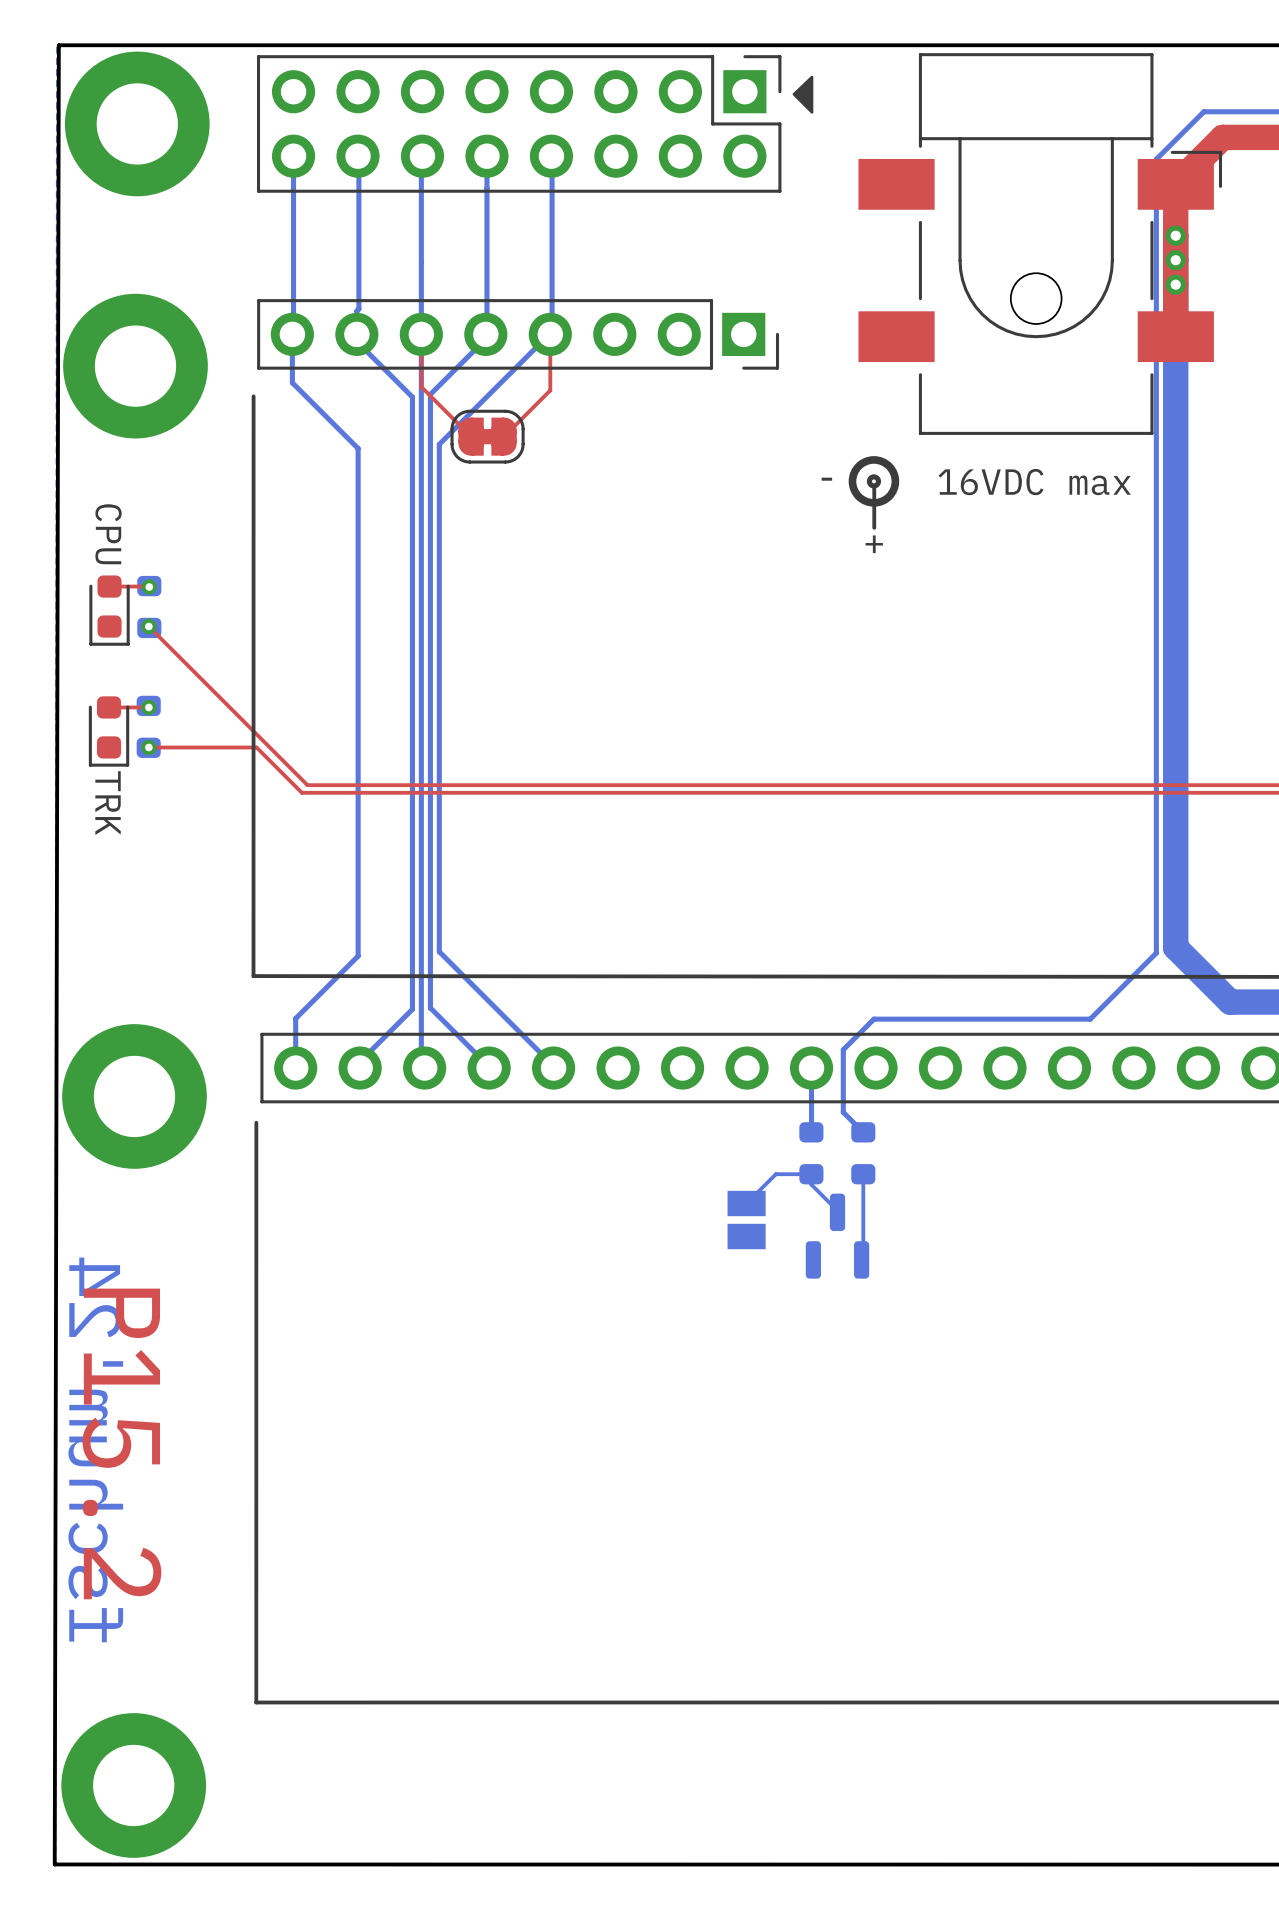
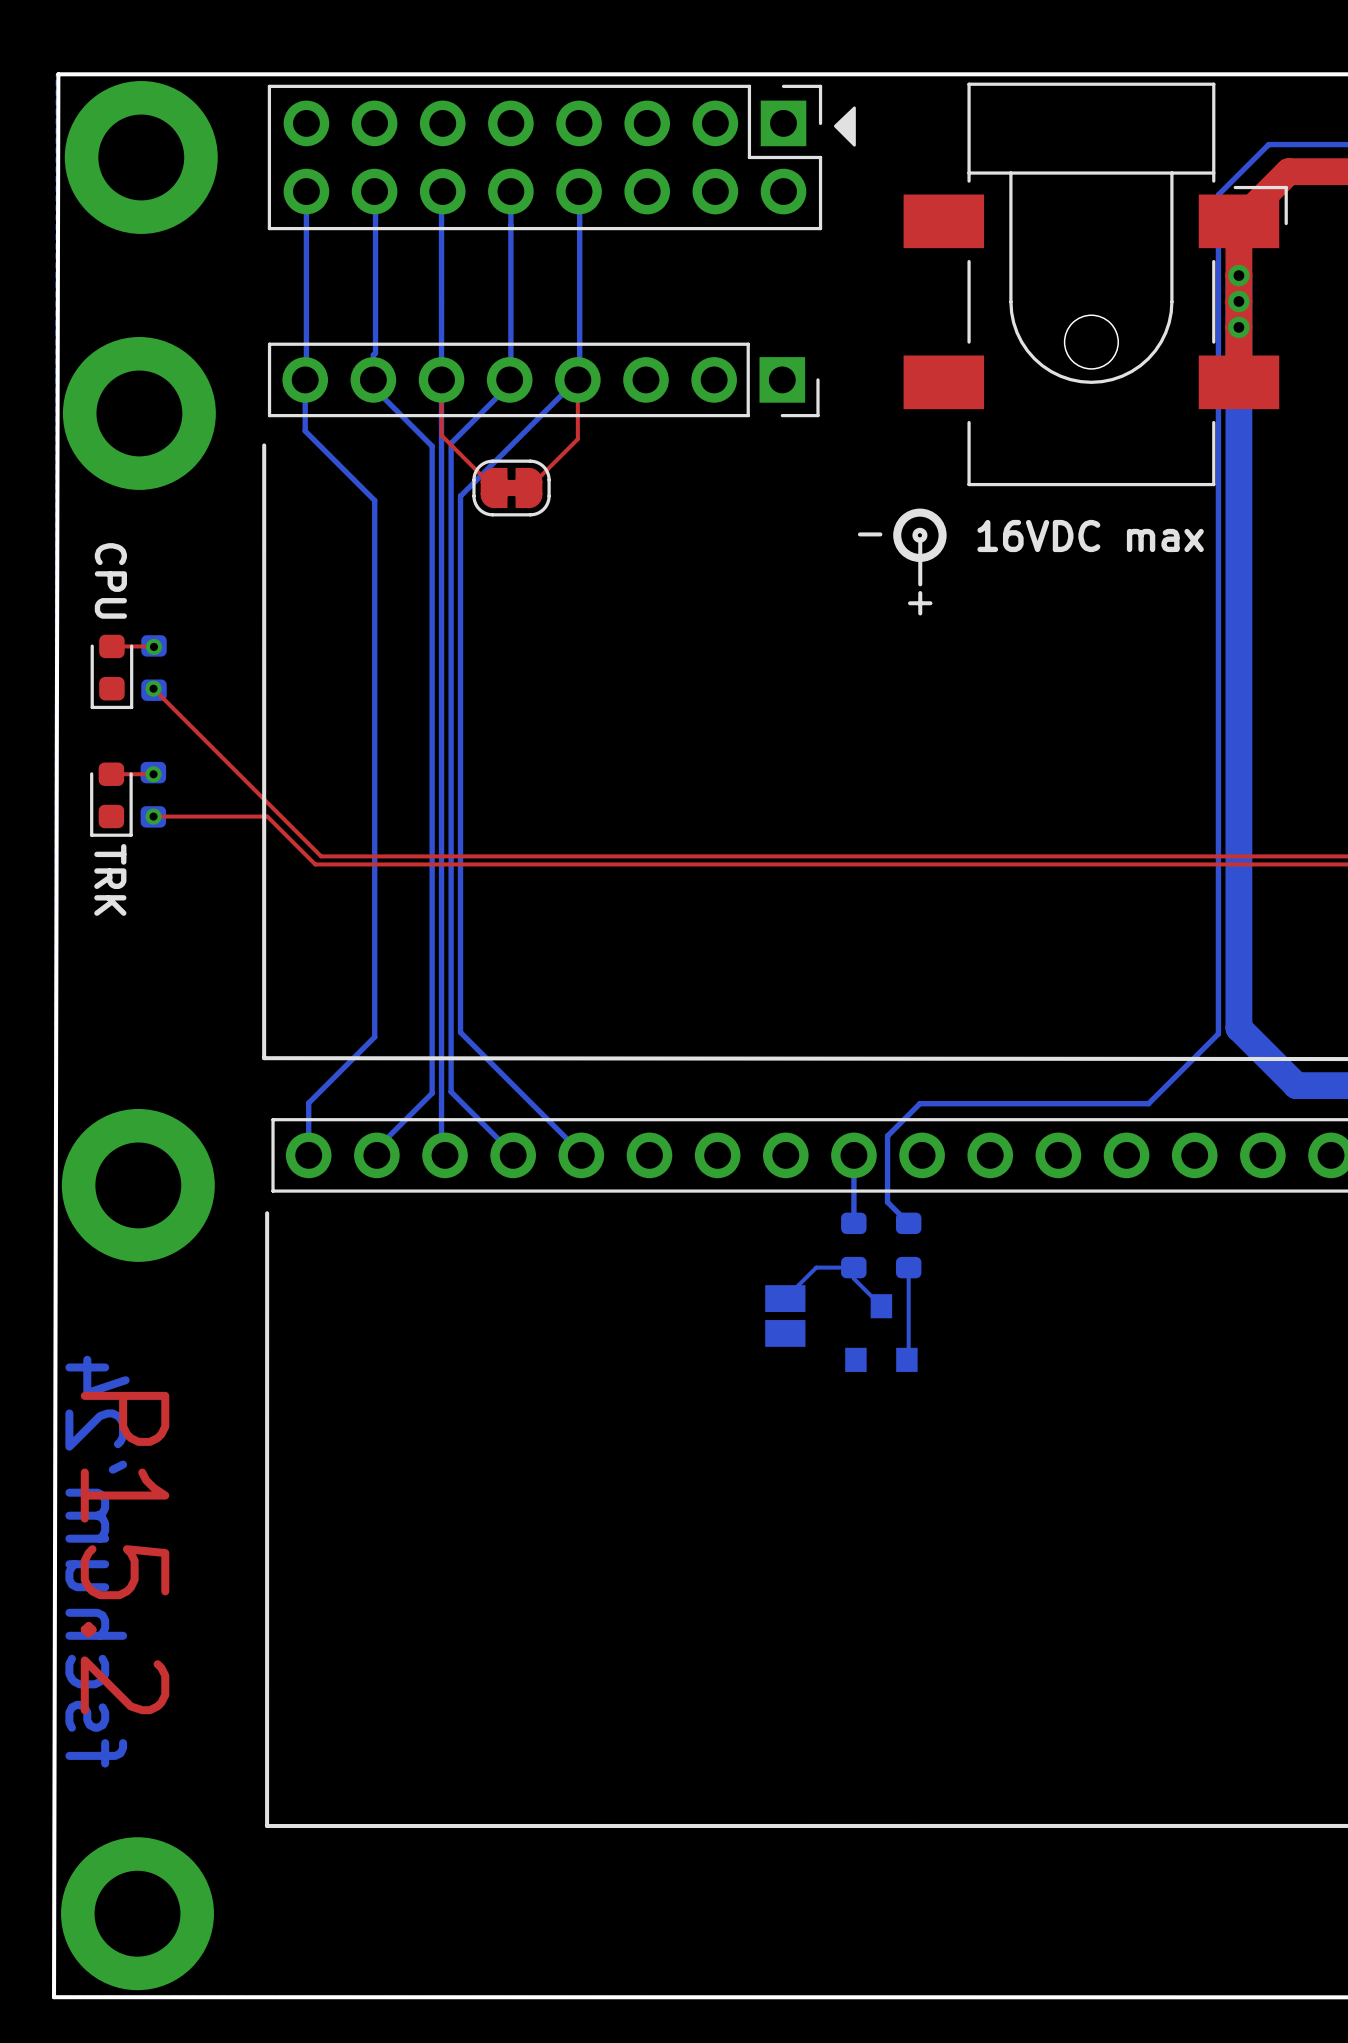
part footprint: [805, 1193, 870, 1279] -> [845, 1294, 918, 1372]

